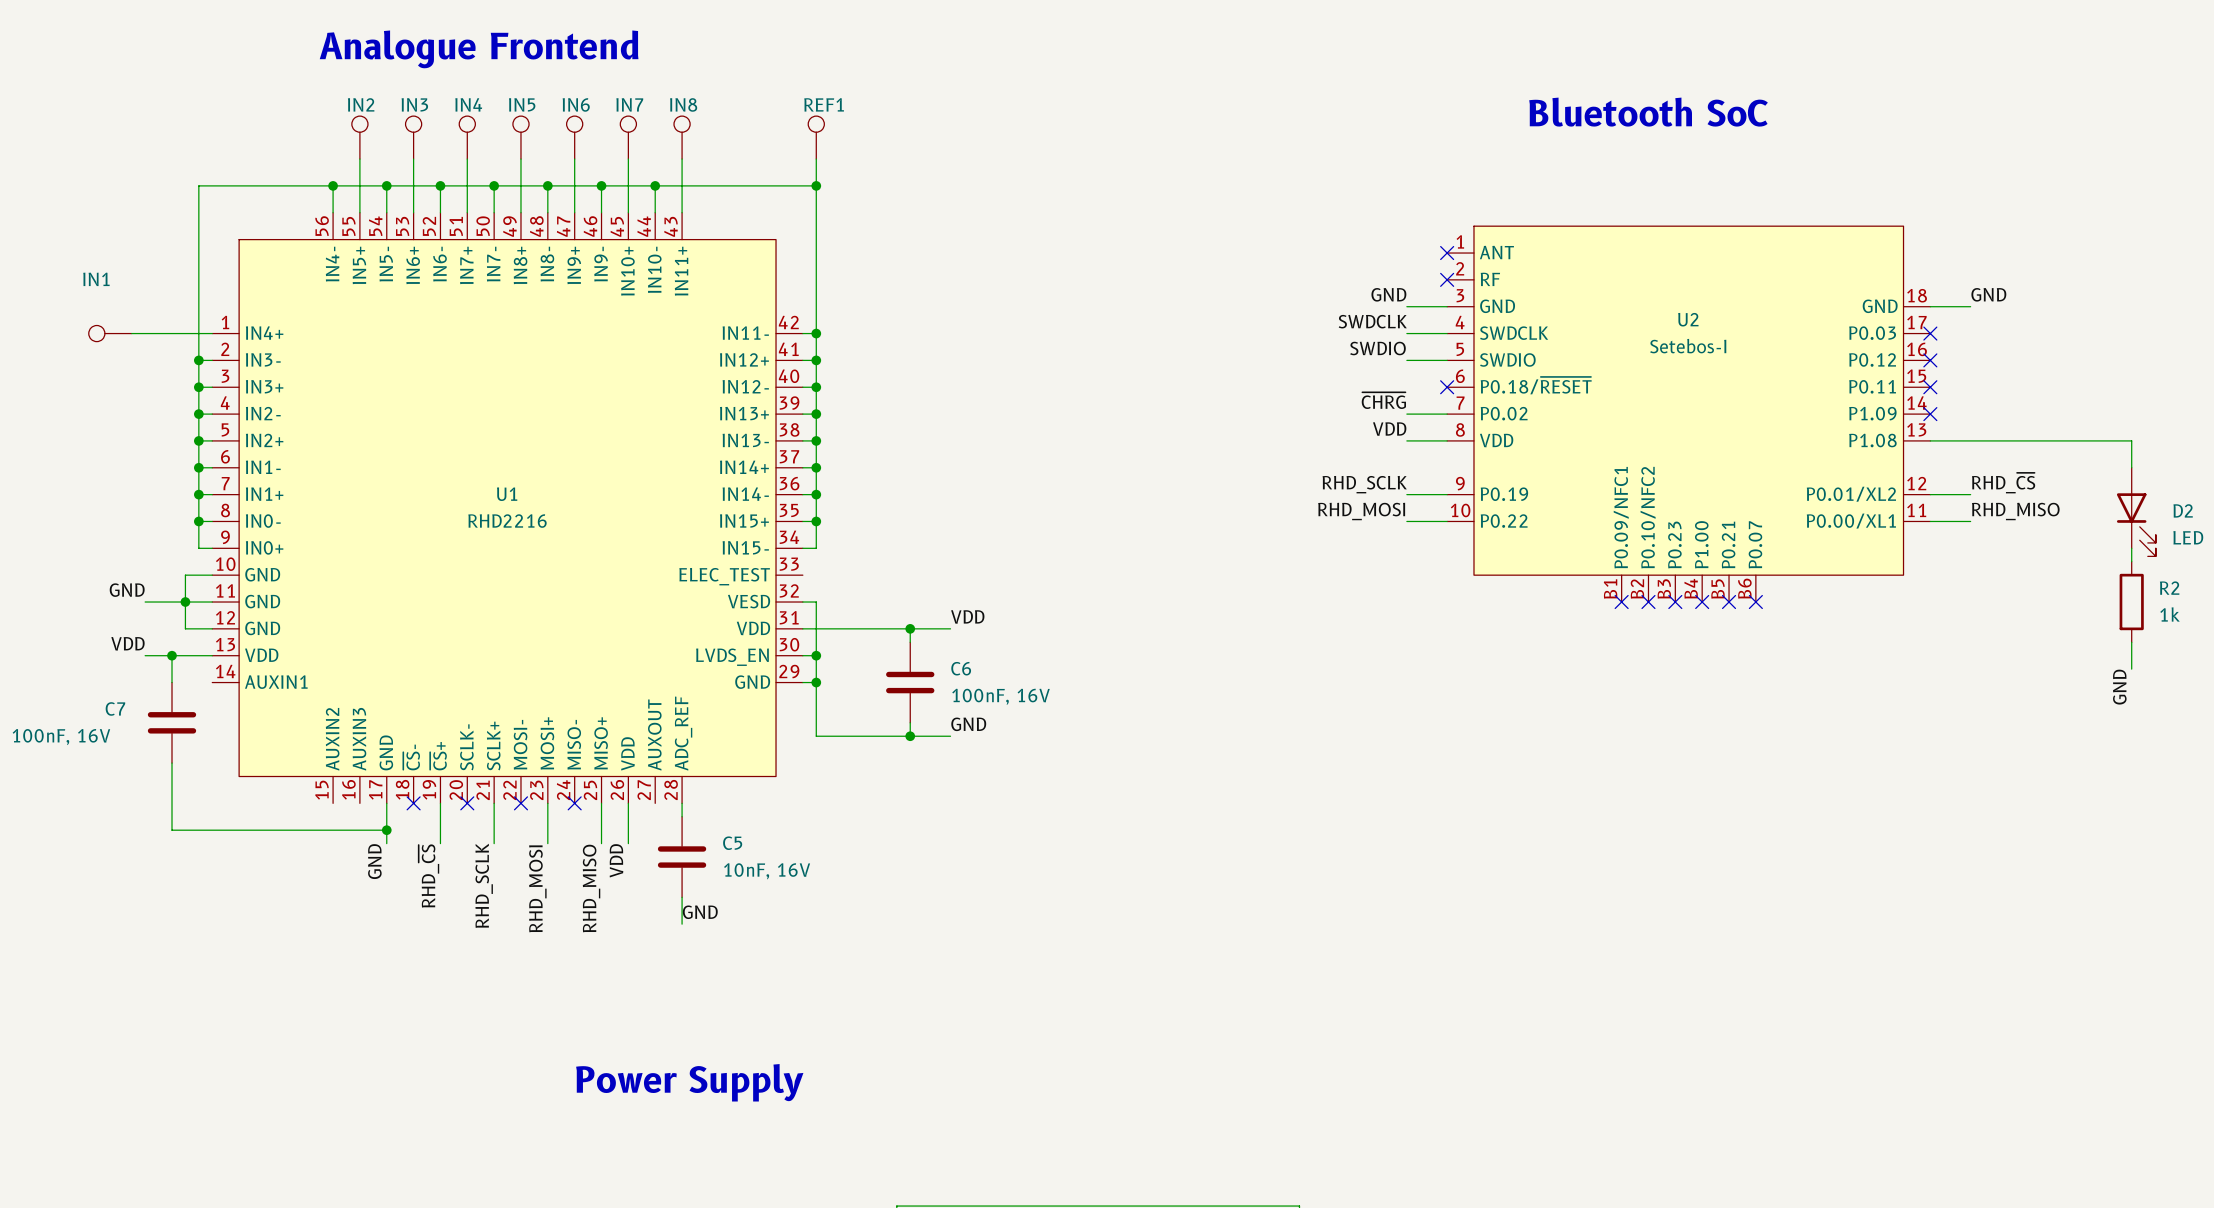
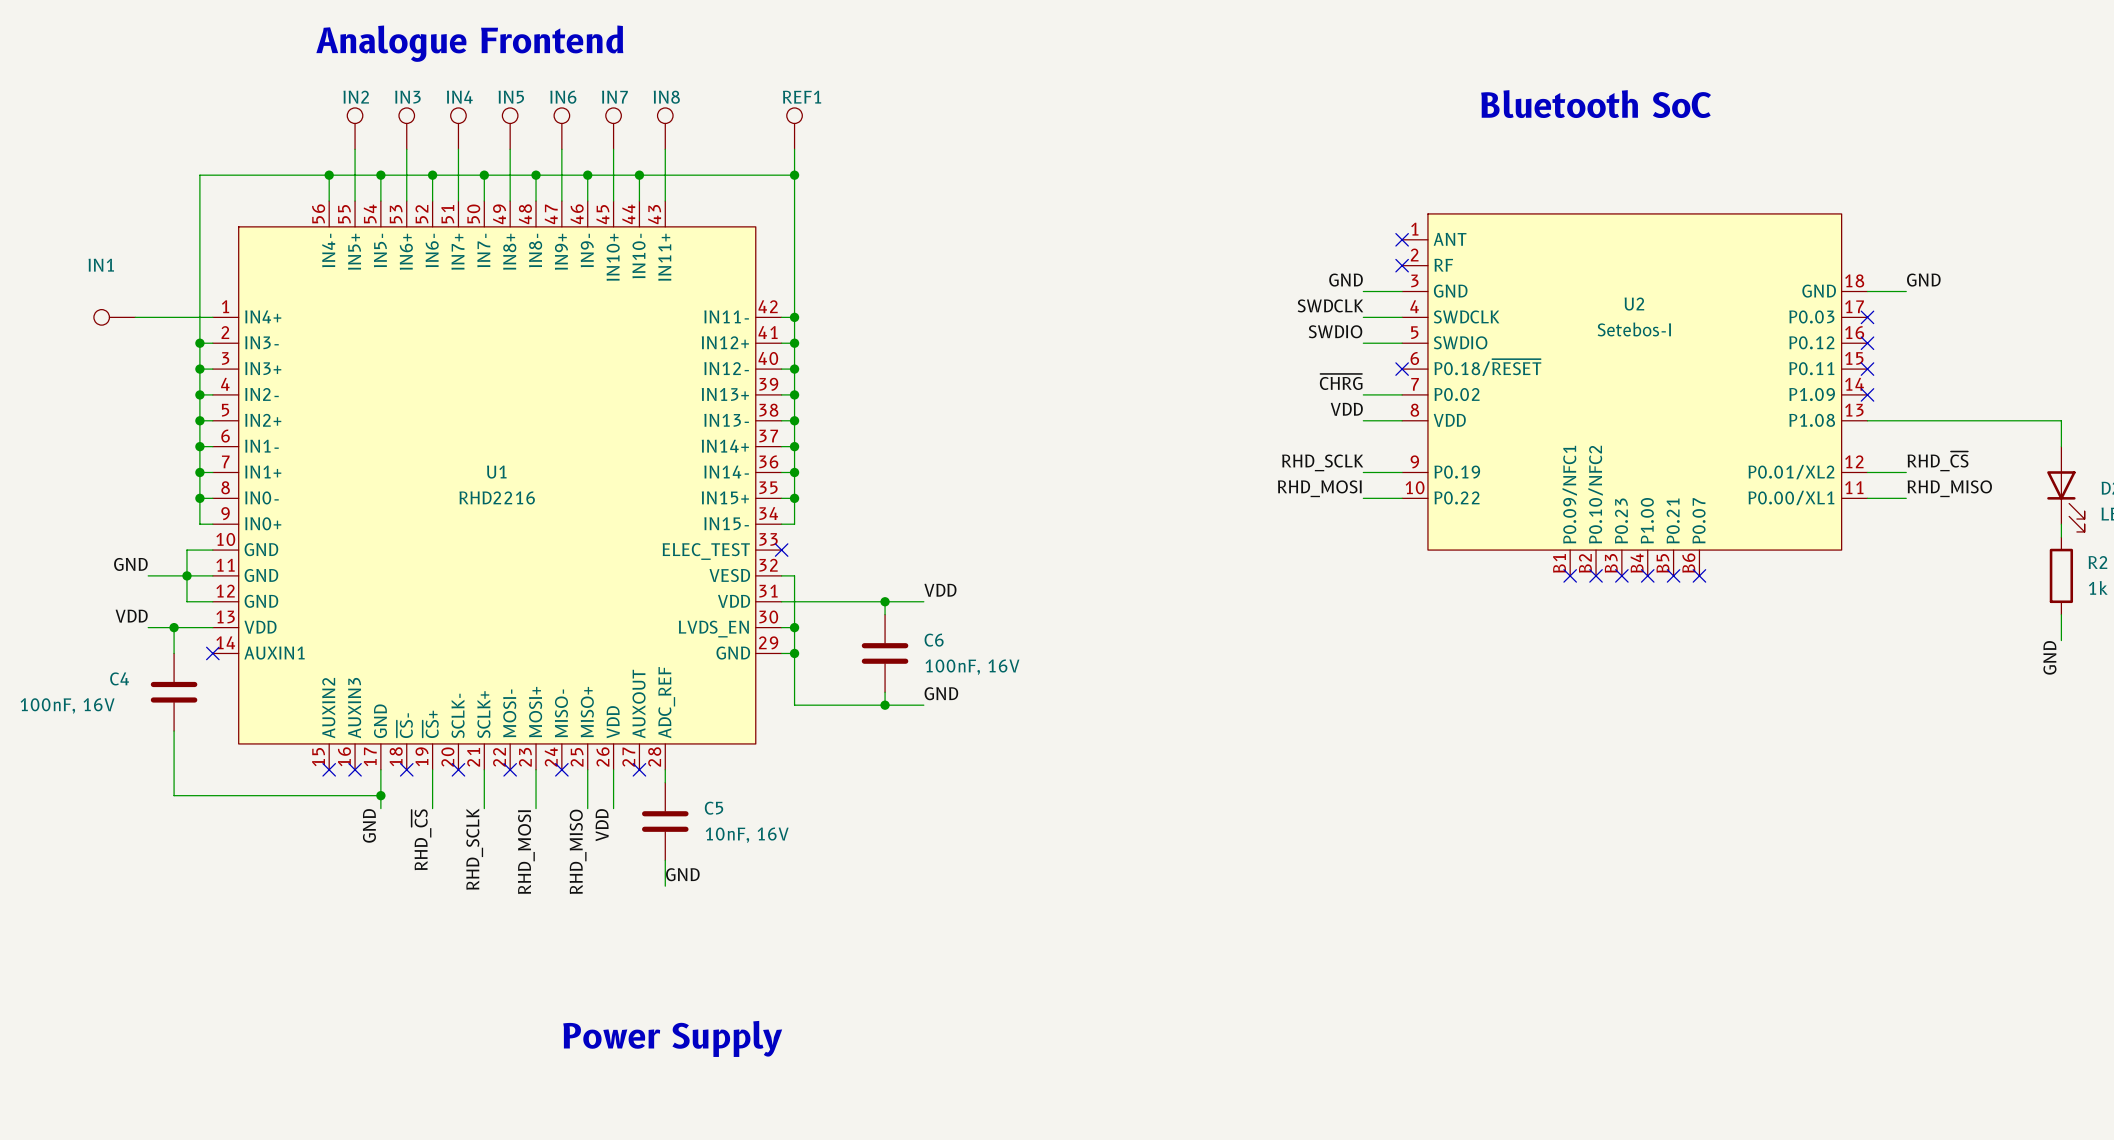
no-connect mark: none -> (781, 550)
no-connect mark: none -> (212, 653)
C7 name: C7 (115, 708) -> C4 (119, 678)
no-connect mark: none -> (329, 769)
no-connect mark: none -> (355, 769)
no-connect mark: none -> (639, 769)

